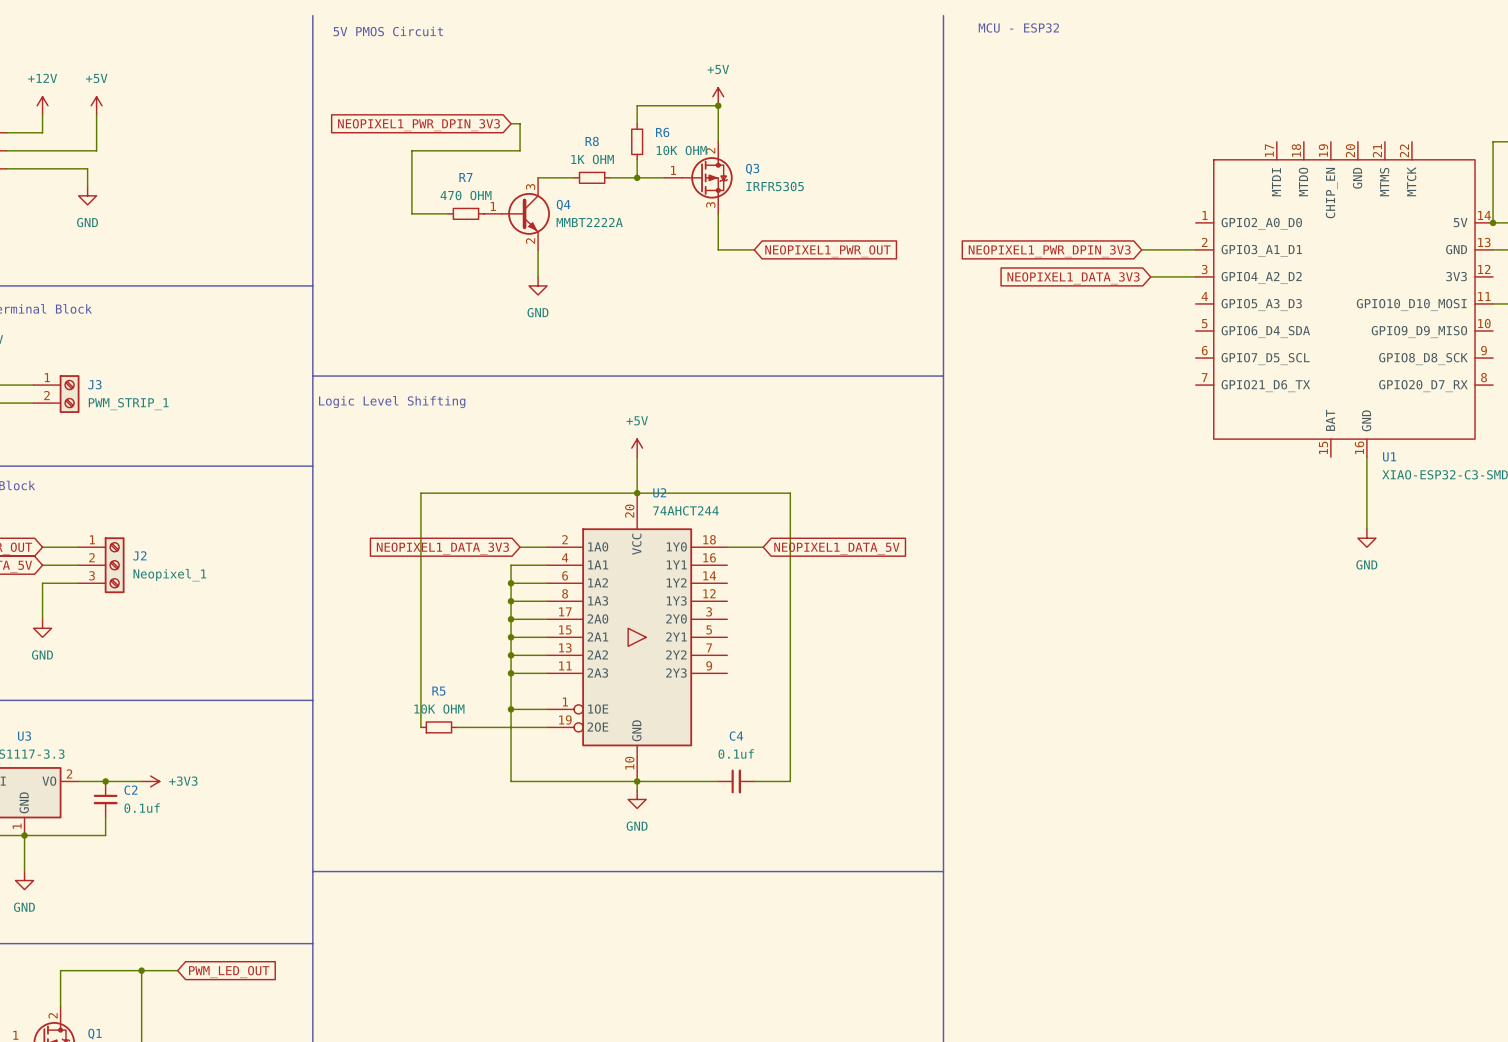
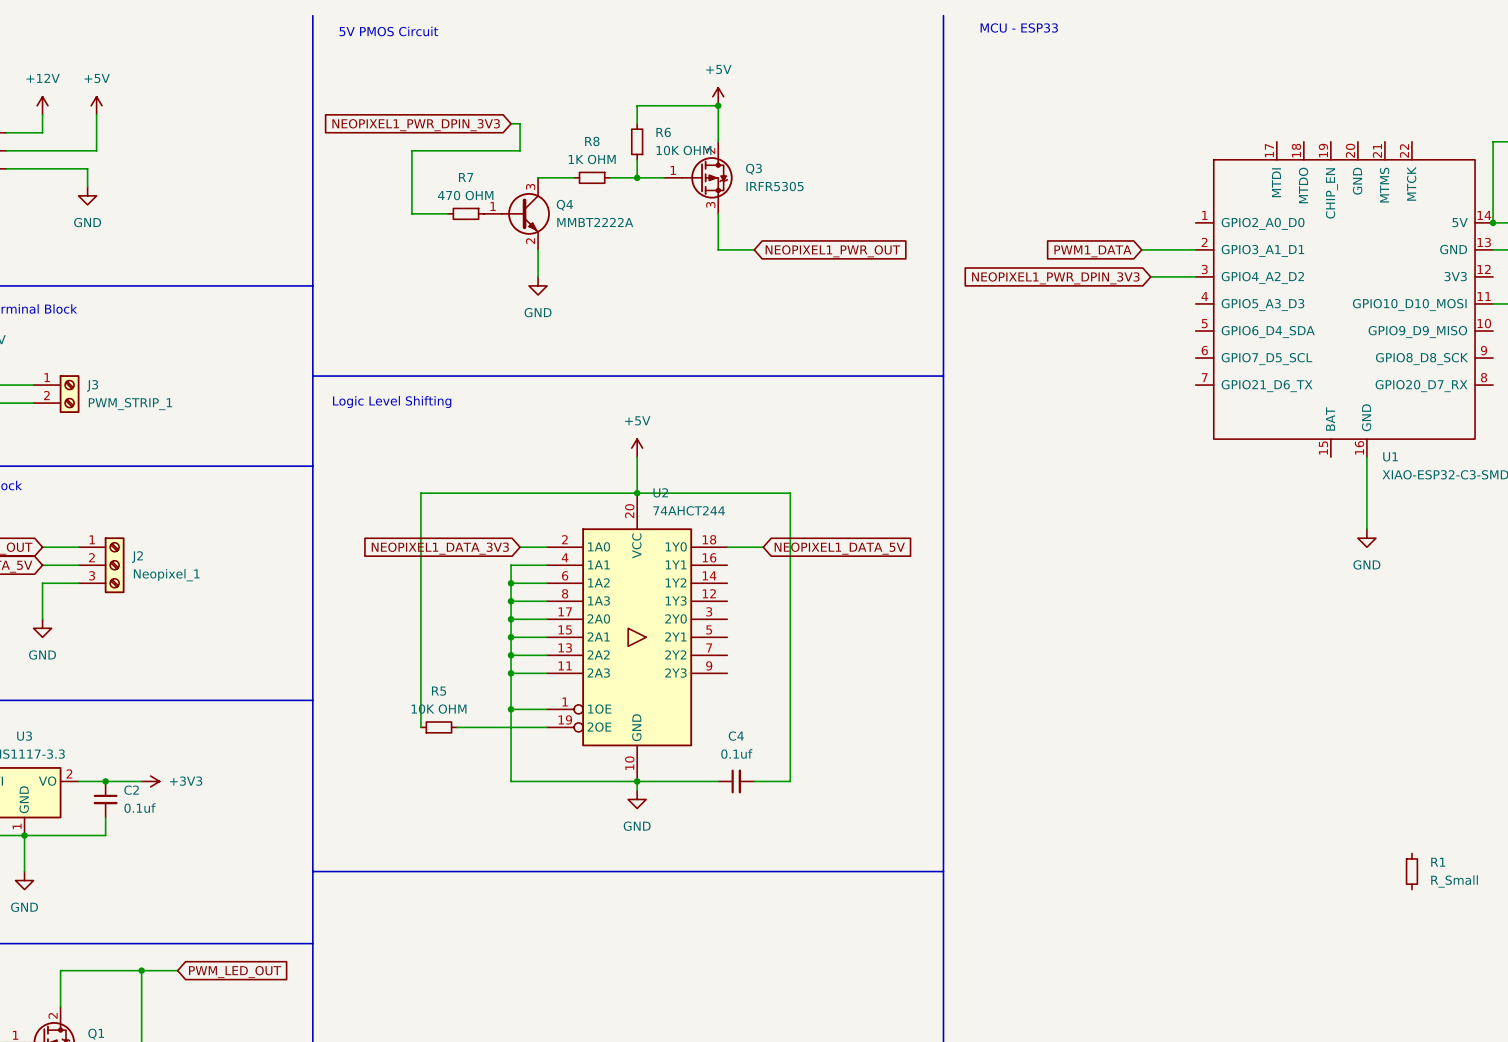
text: MCU - ESP32 (1018, 27) -> MCU - ESP33 (1019, 27)
global label: NEOPIXEL1_PWR_DPIN_3V3 (1049, 251) -> PWM1_DATA (1092, 251)
global label: NEOPIXEL1_DATA_3V3 (1073, 278) -> NEOPIXEL1_PWR_DPIN_3V3 (1055, 278)
R1: none -> R_Small (1411, 871)

